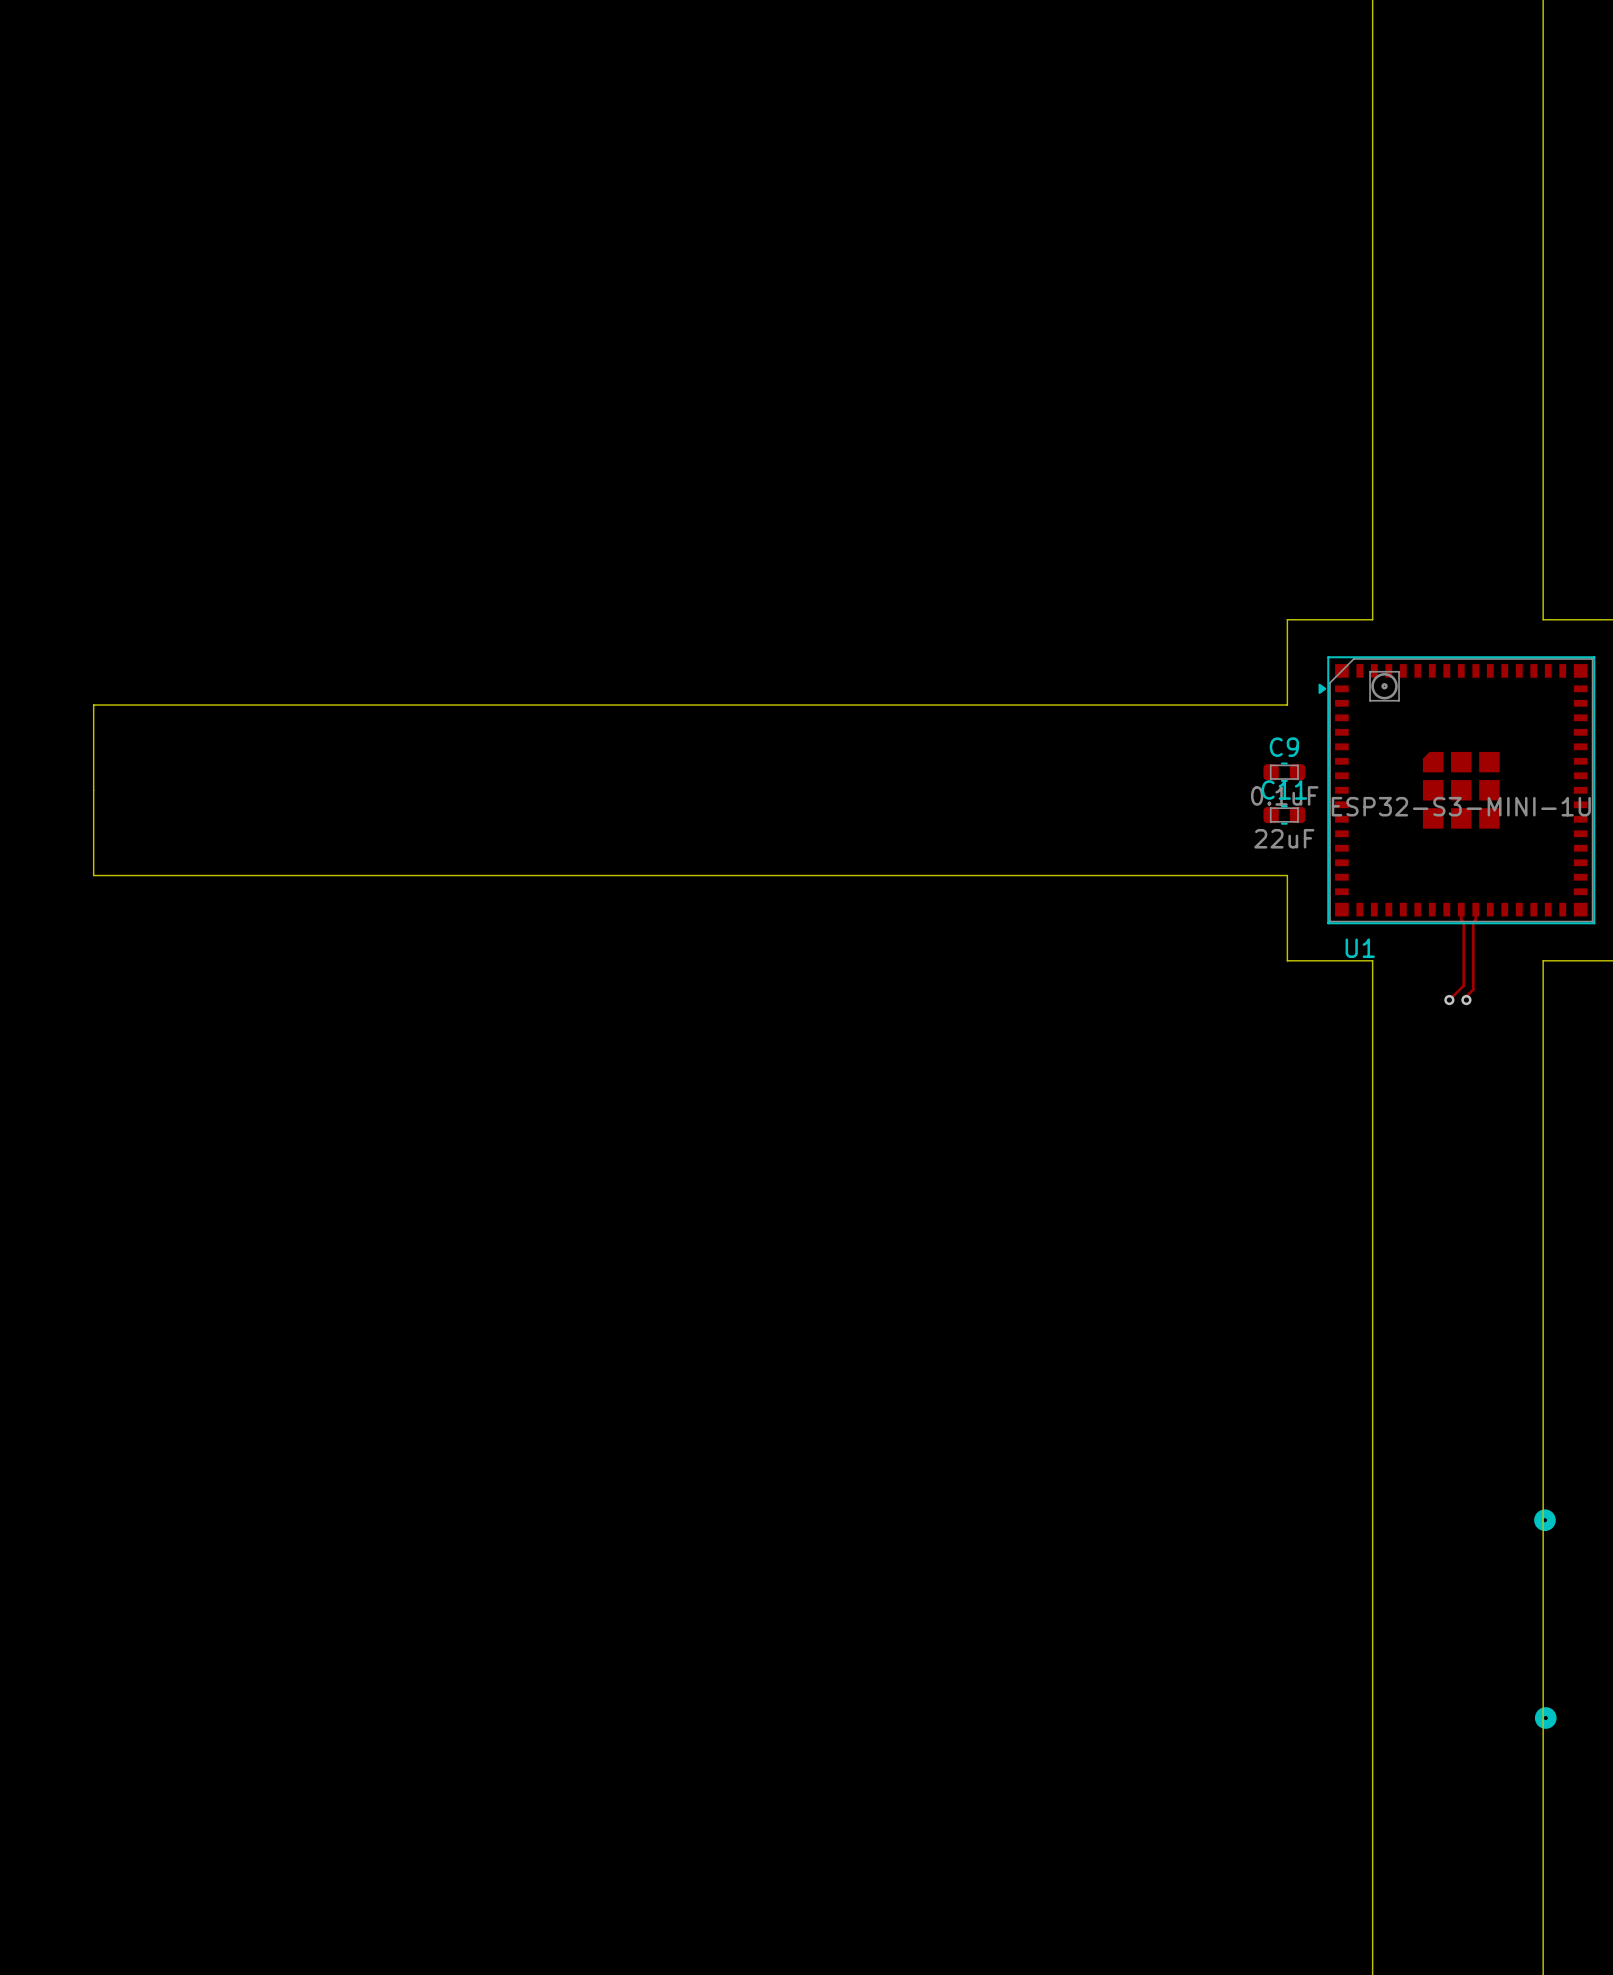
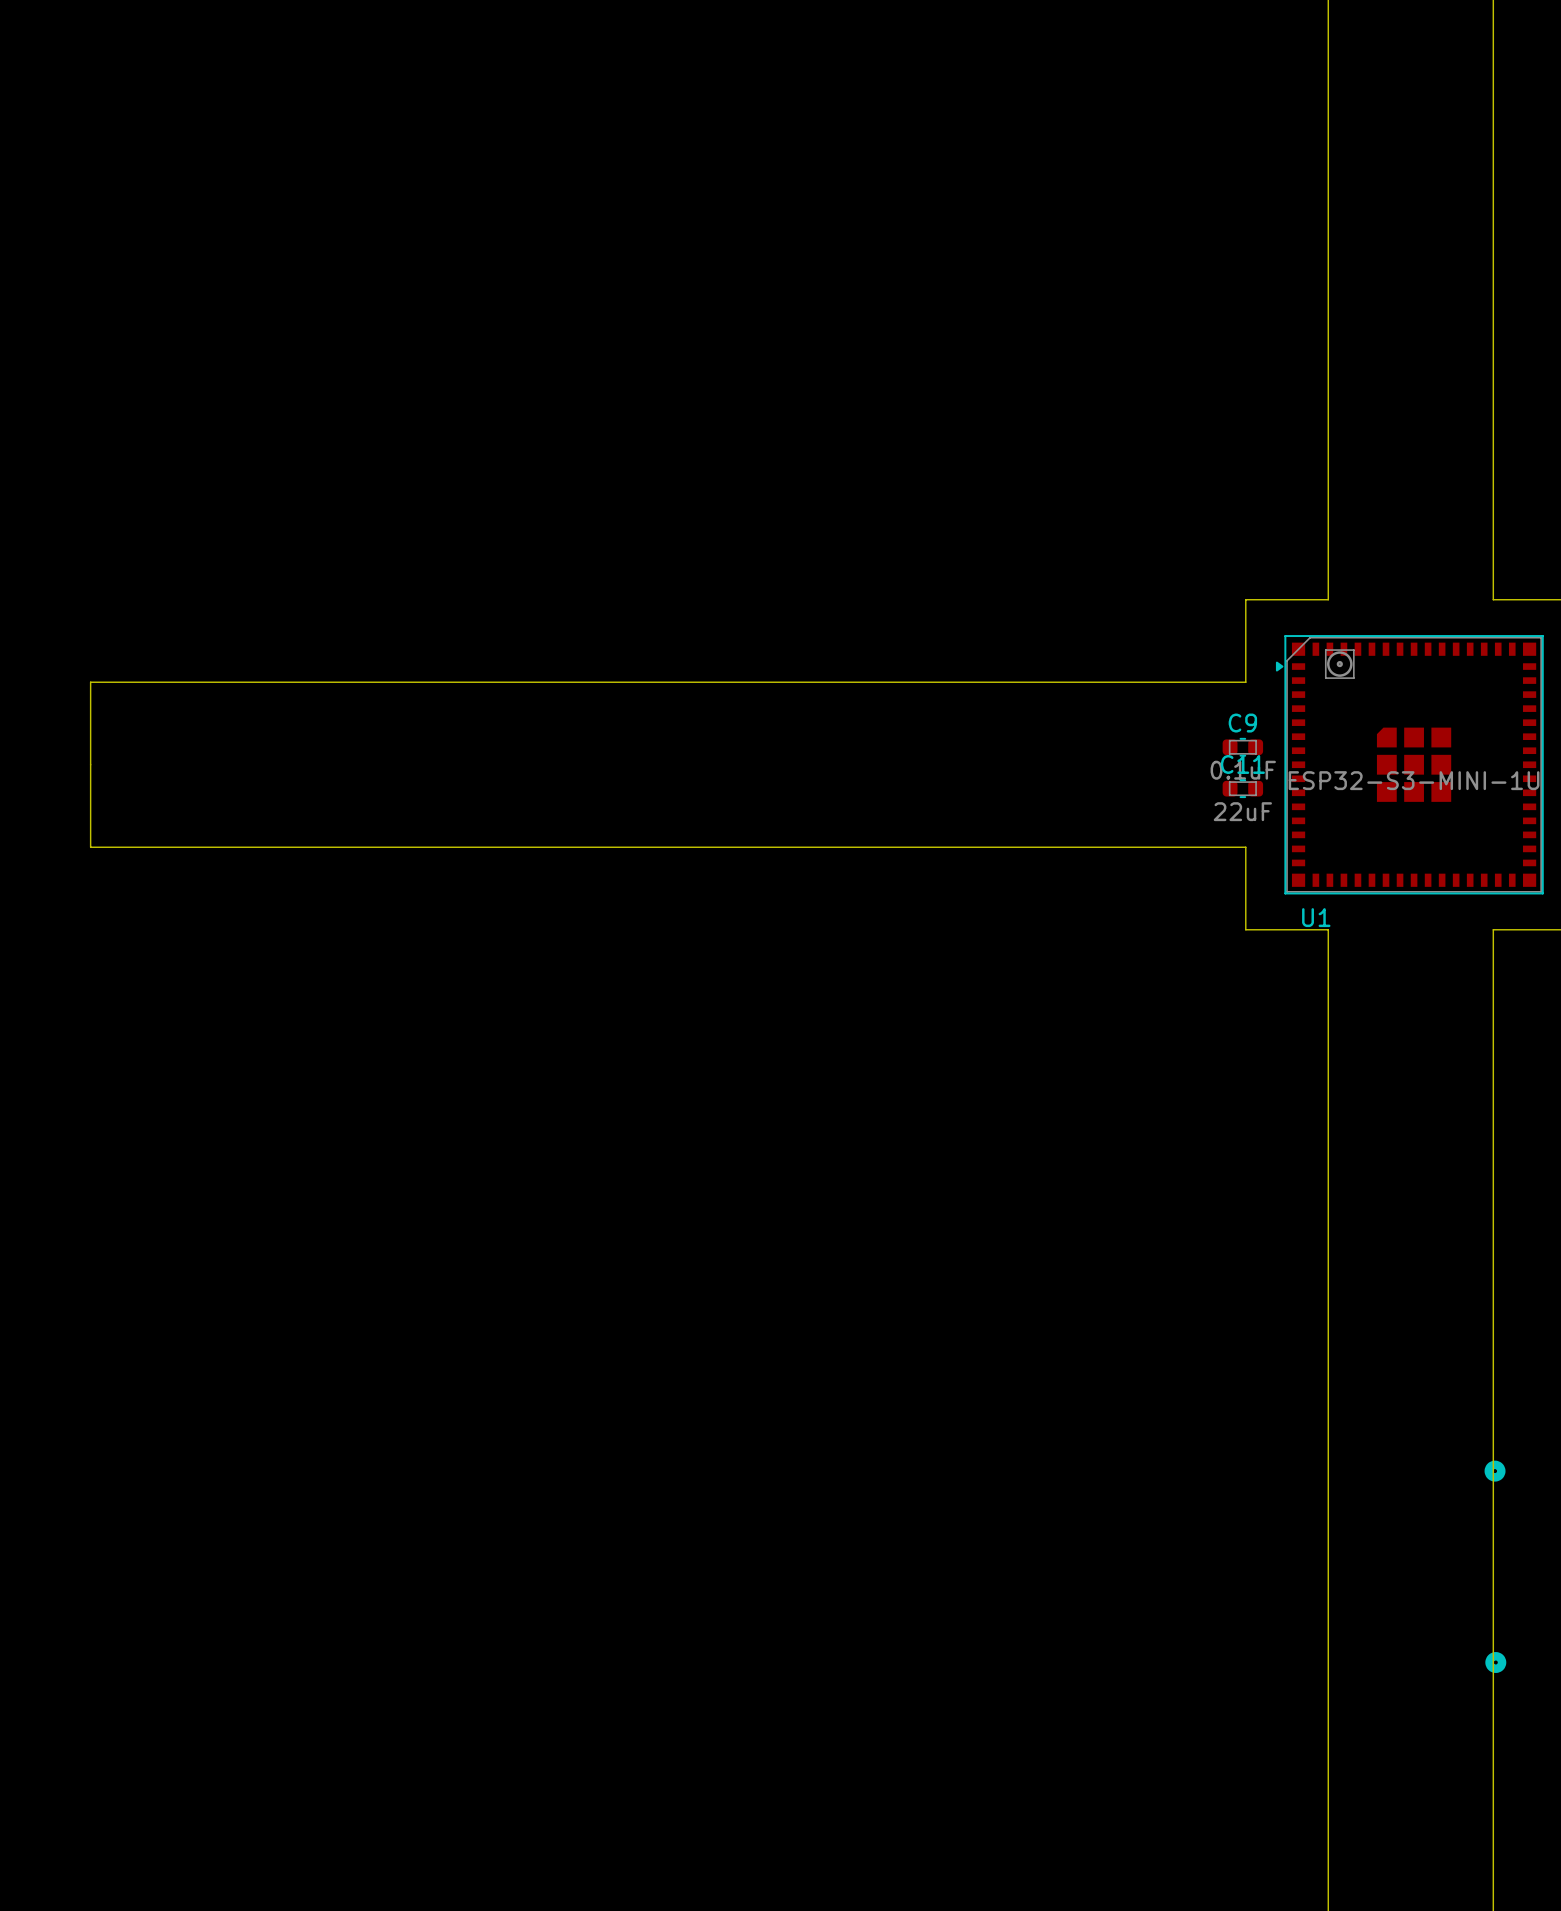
track: (1461, 909) (1461, 919) (1463, 922) (1463, 985) (1449, 1000) -> none
track: (1475, 909) (1475, 919) (1473, 922) (1473, 989) (1466, 996) (1466, 1000) -> none
via: (1449, 1000) -> none
via: (1466, 1000) -> none

